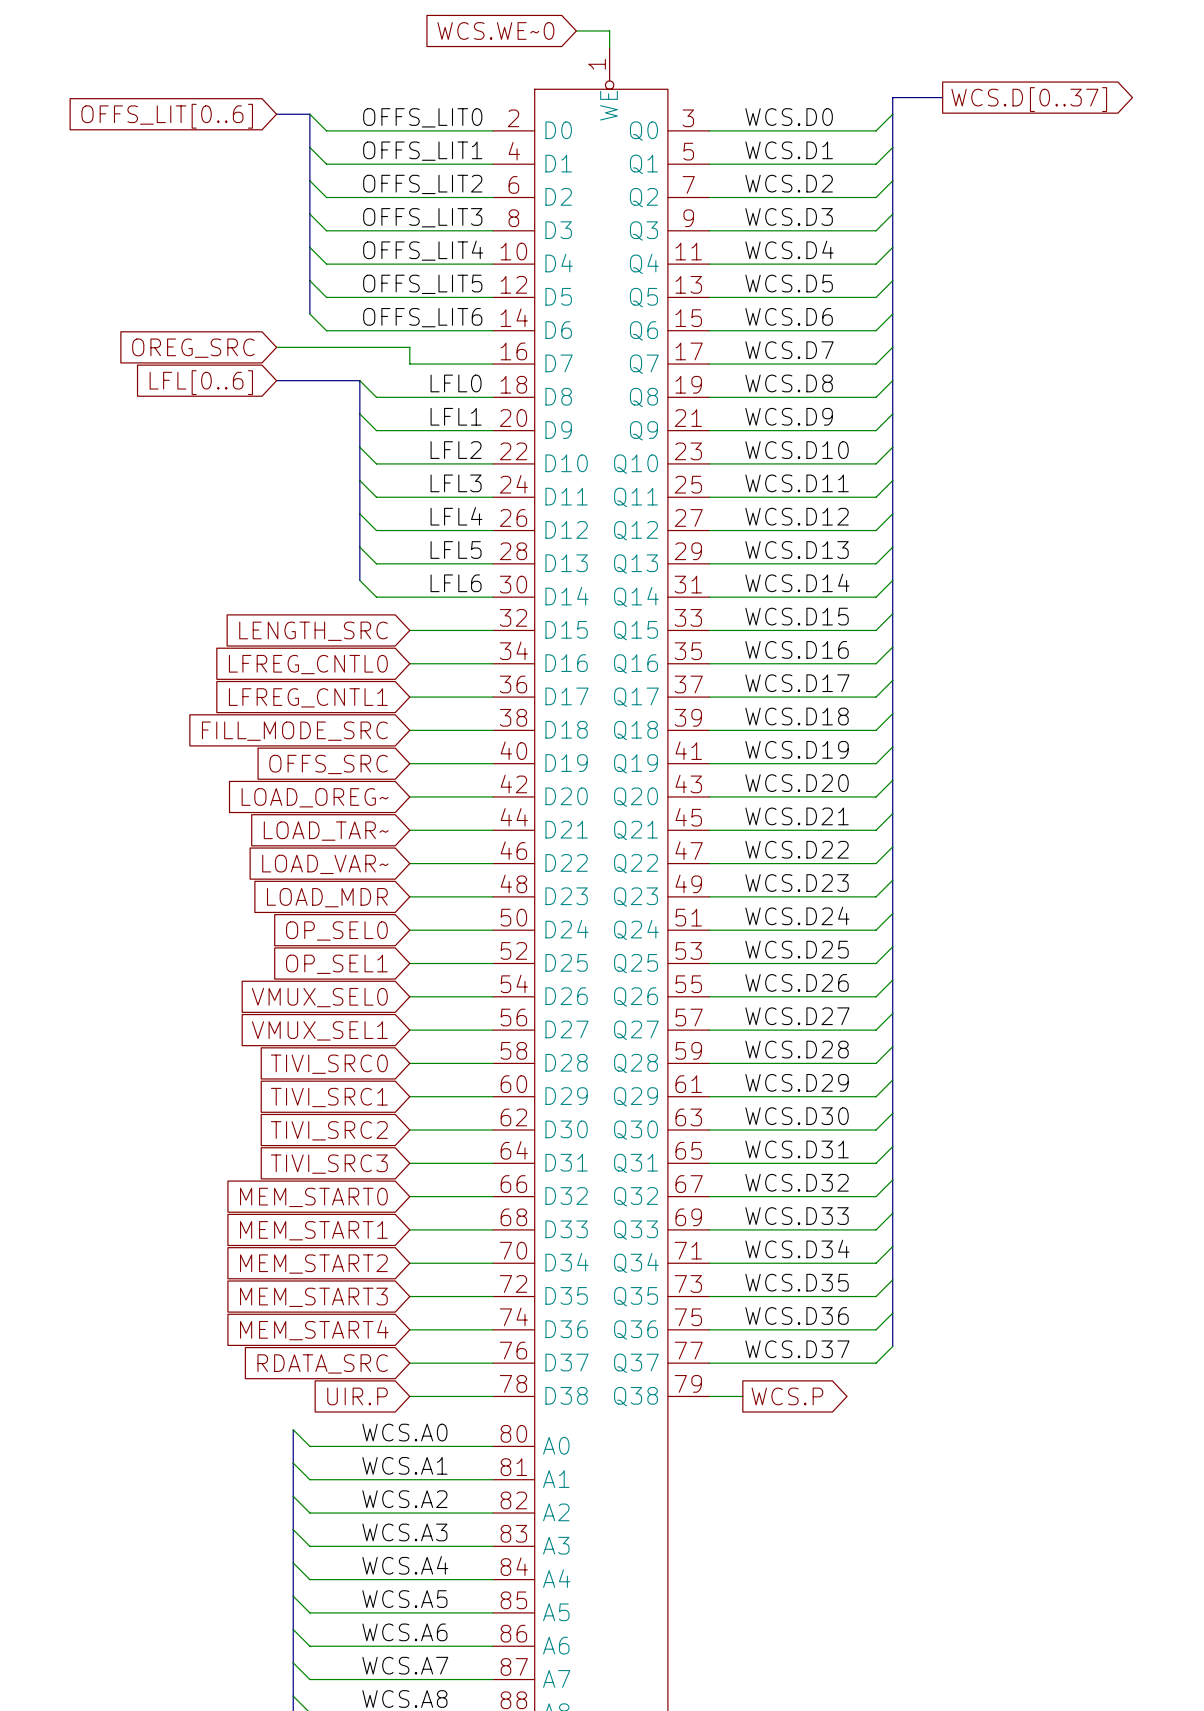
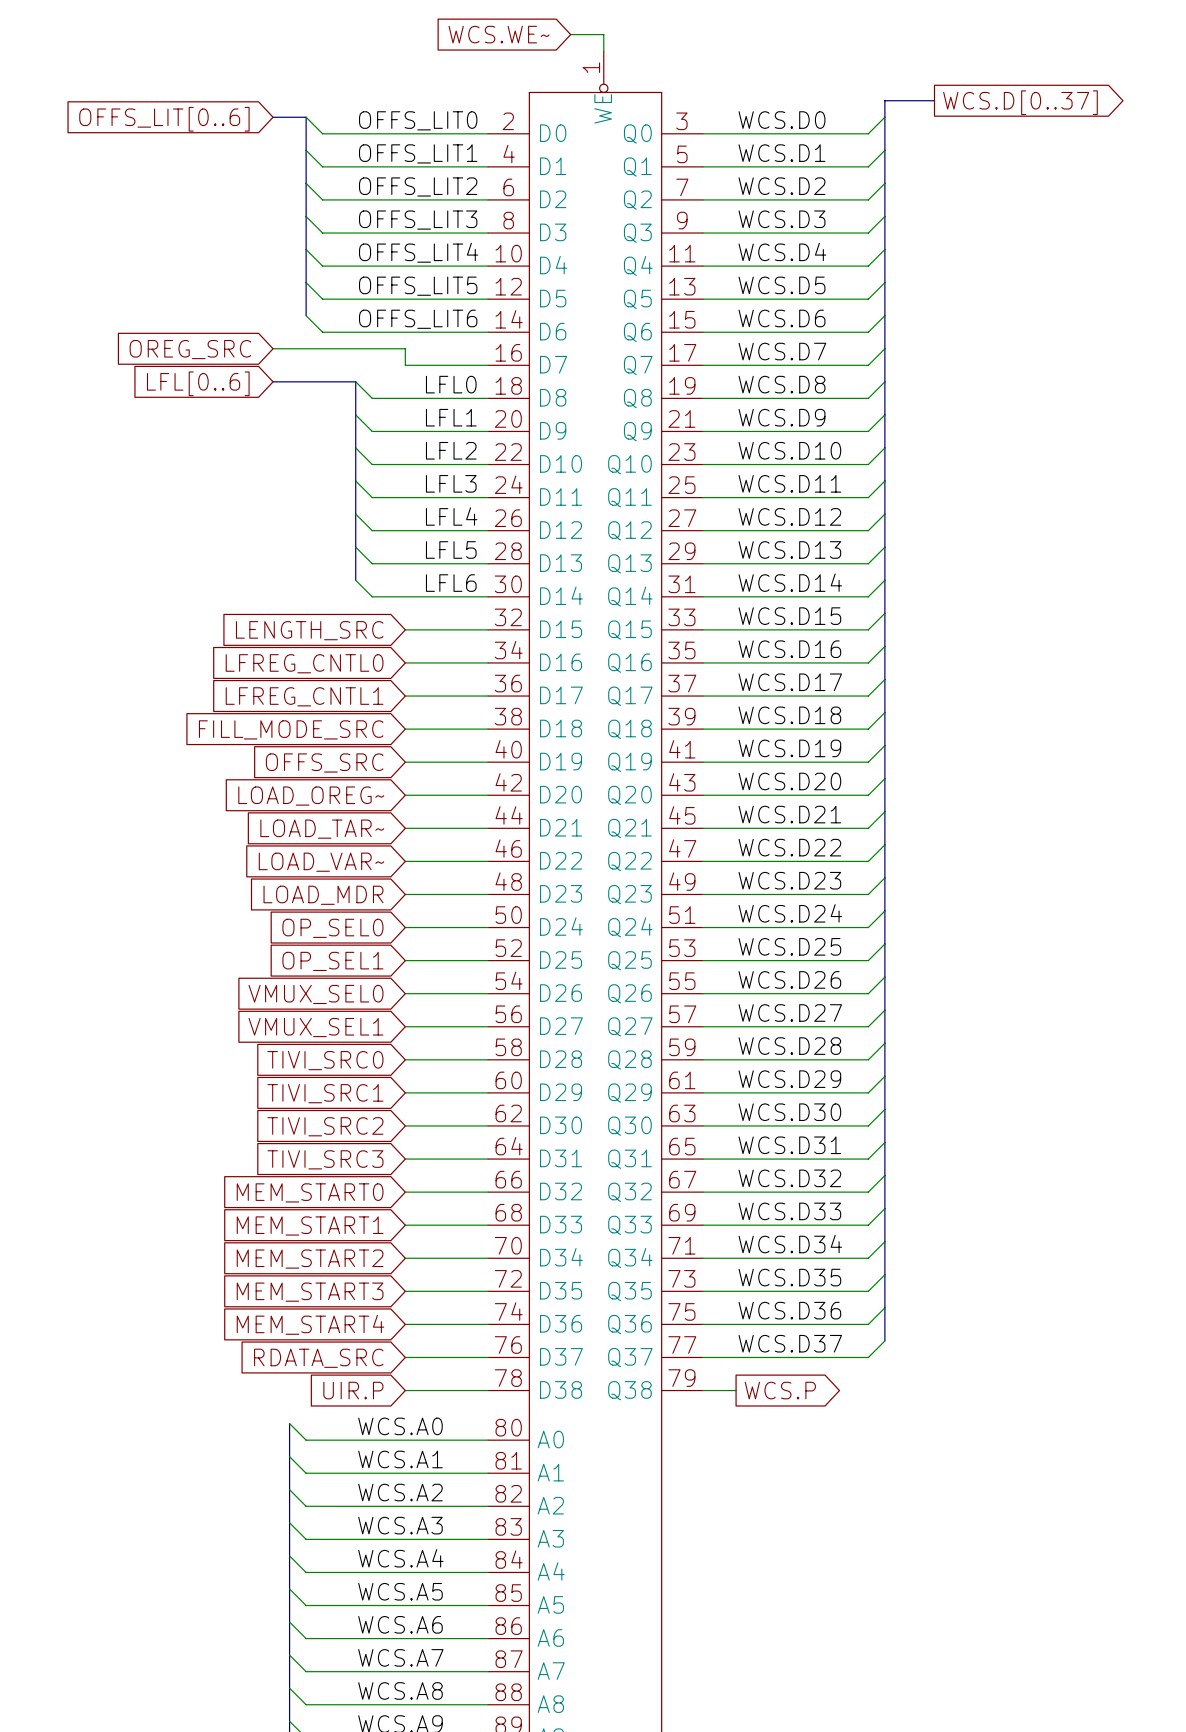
global label: WCS.WE~0 (495, 30) -> WCS.WE~ (499, 34)

